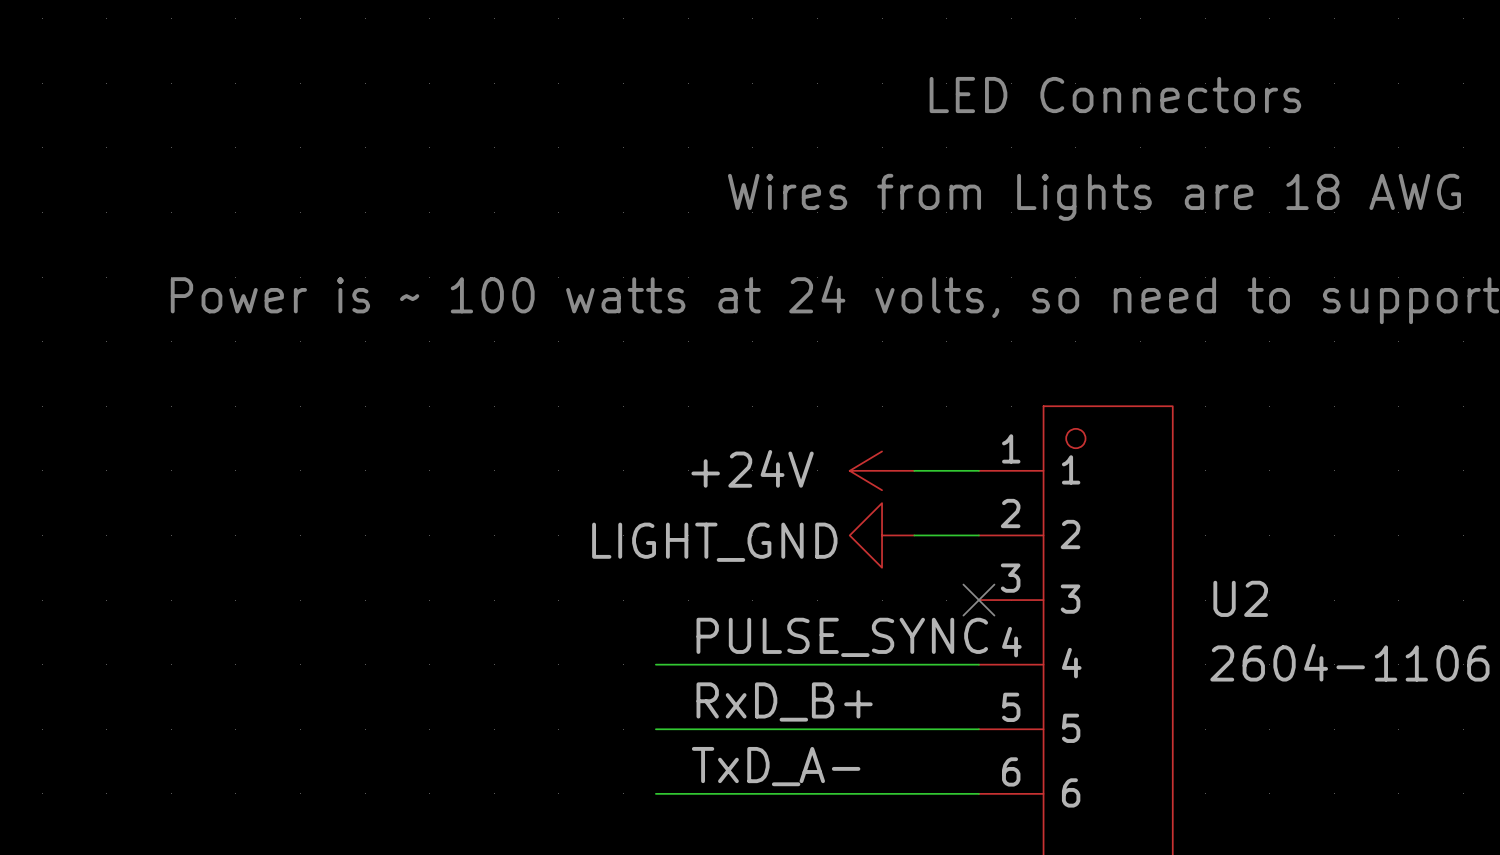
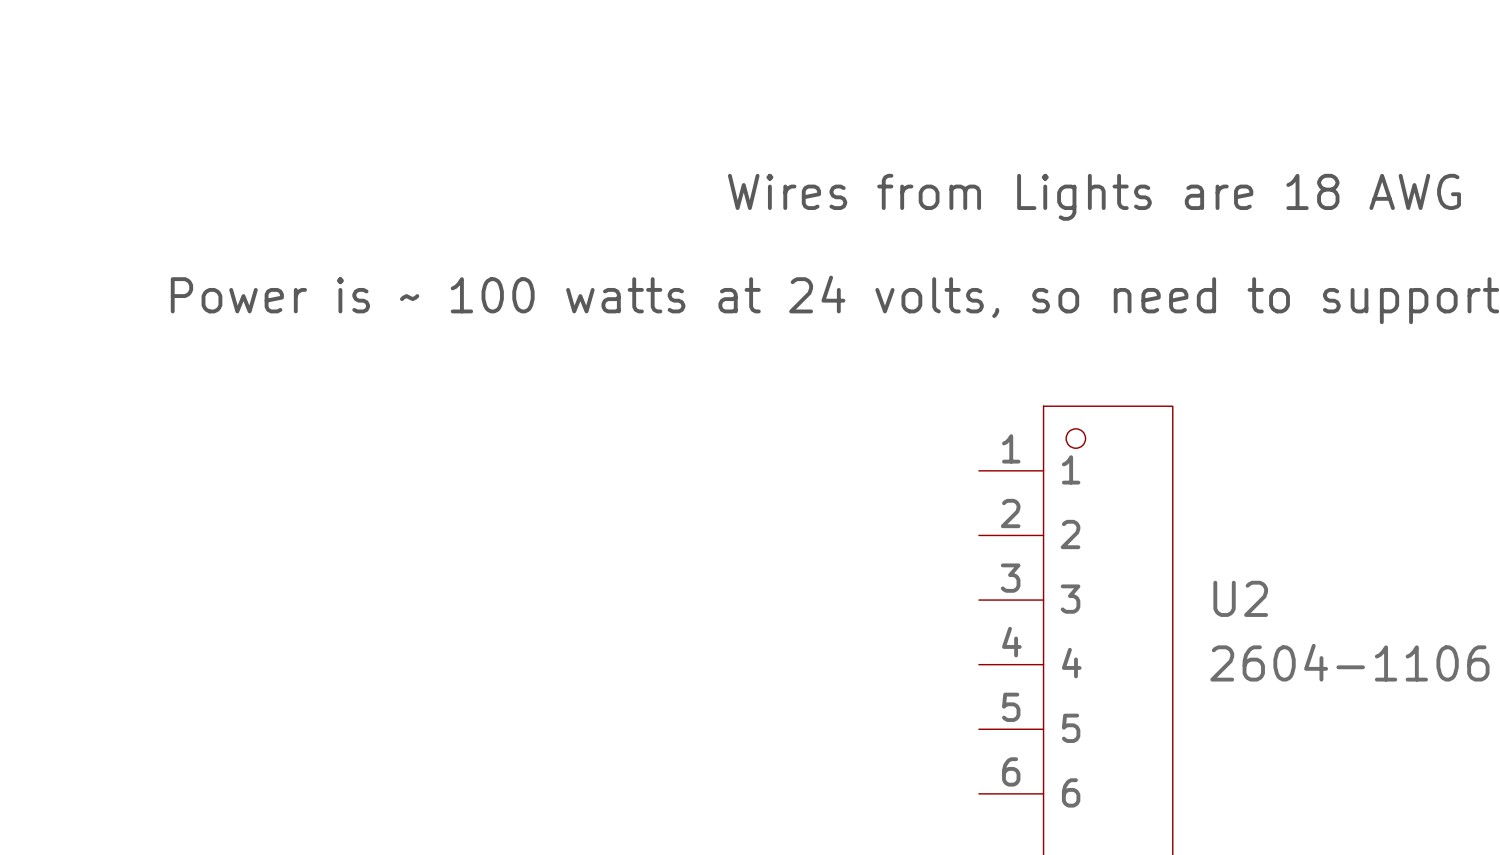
text: LED Connectors (1115, 95) -> none
power symbol: +24V (882, 470) -> none
wire: (914, 470) (978, 470) -> none
power symbol: LIGHT_GND (882, 535) -> none
wire: (914, 535) (978, 535) -> none
no-connect mark: (978, 600) -> none
label: PULSE_SYNC (842, 637) -> none
wire: (655, 664) (978, 664) -> none
label: RxD_B+ (784, 701) -> none
wire: (655, 729) (978, 729) -> none
label: TxD_A- (776, 766) -> none
wire: (655, 793) (978, 793) -> none

